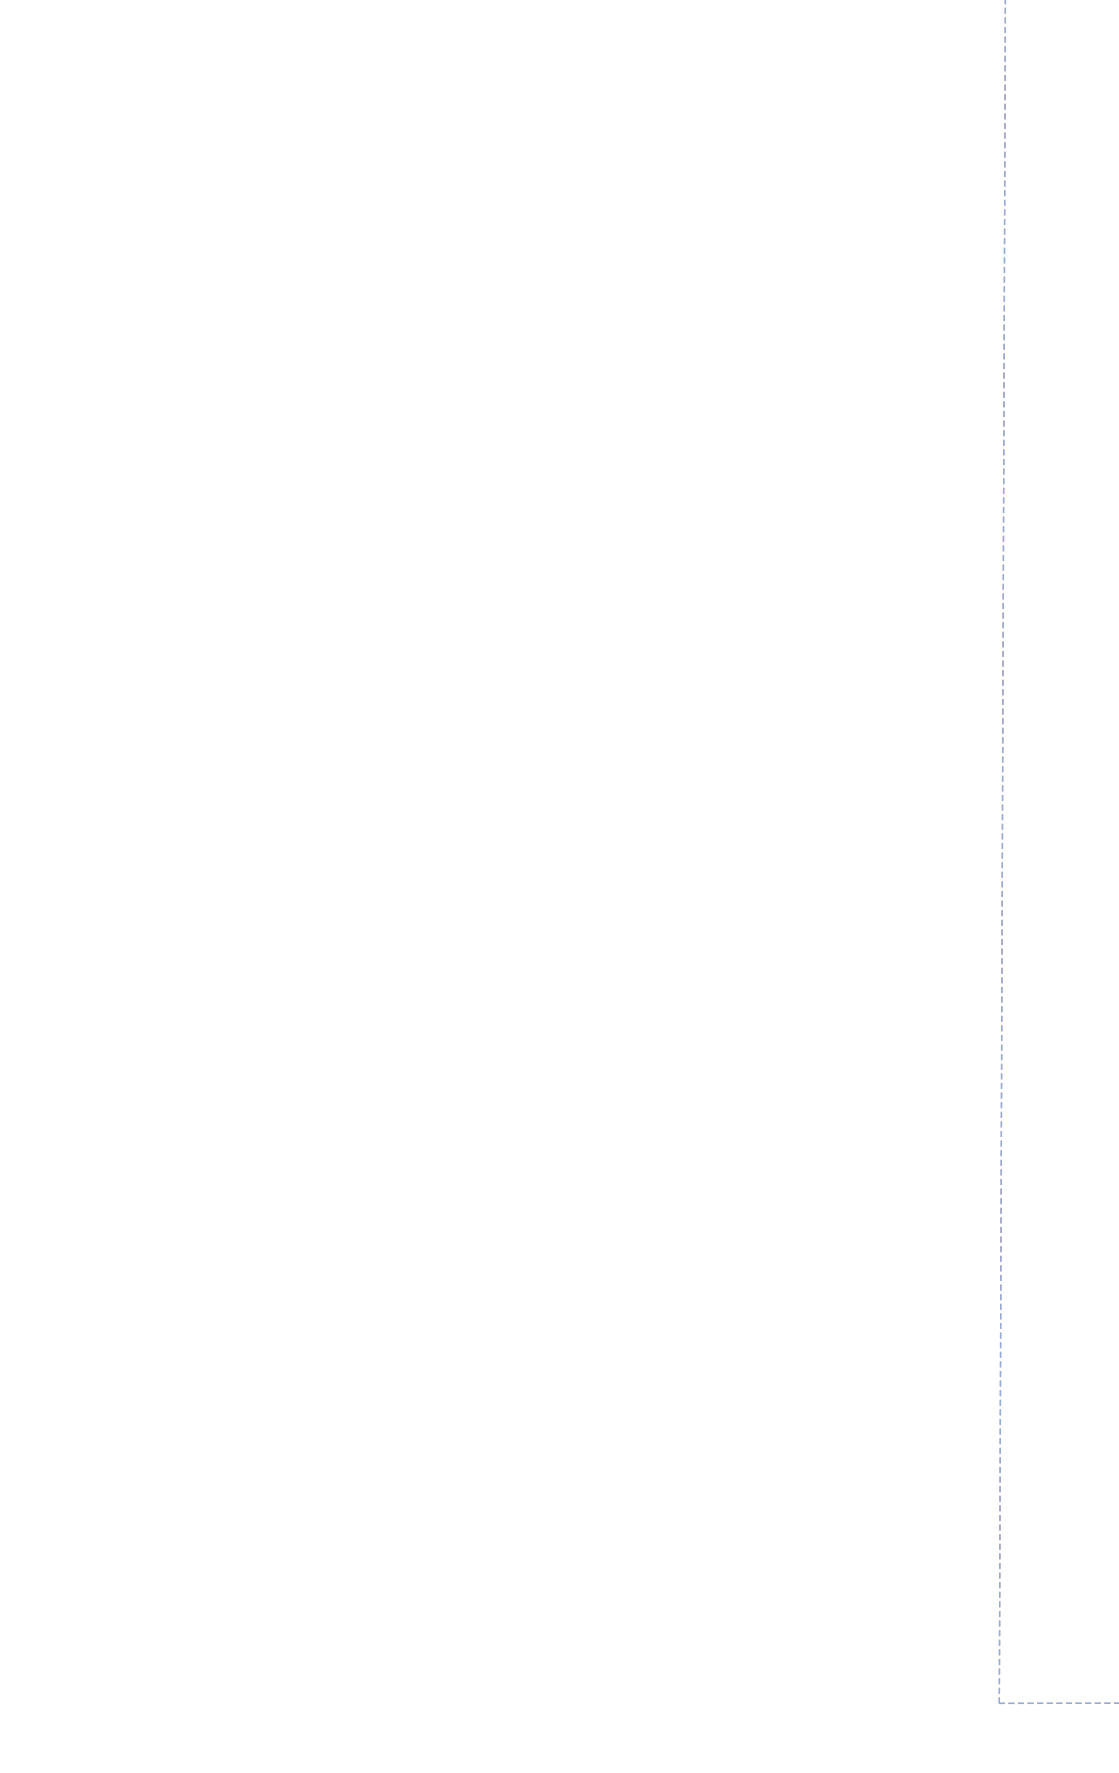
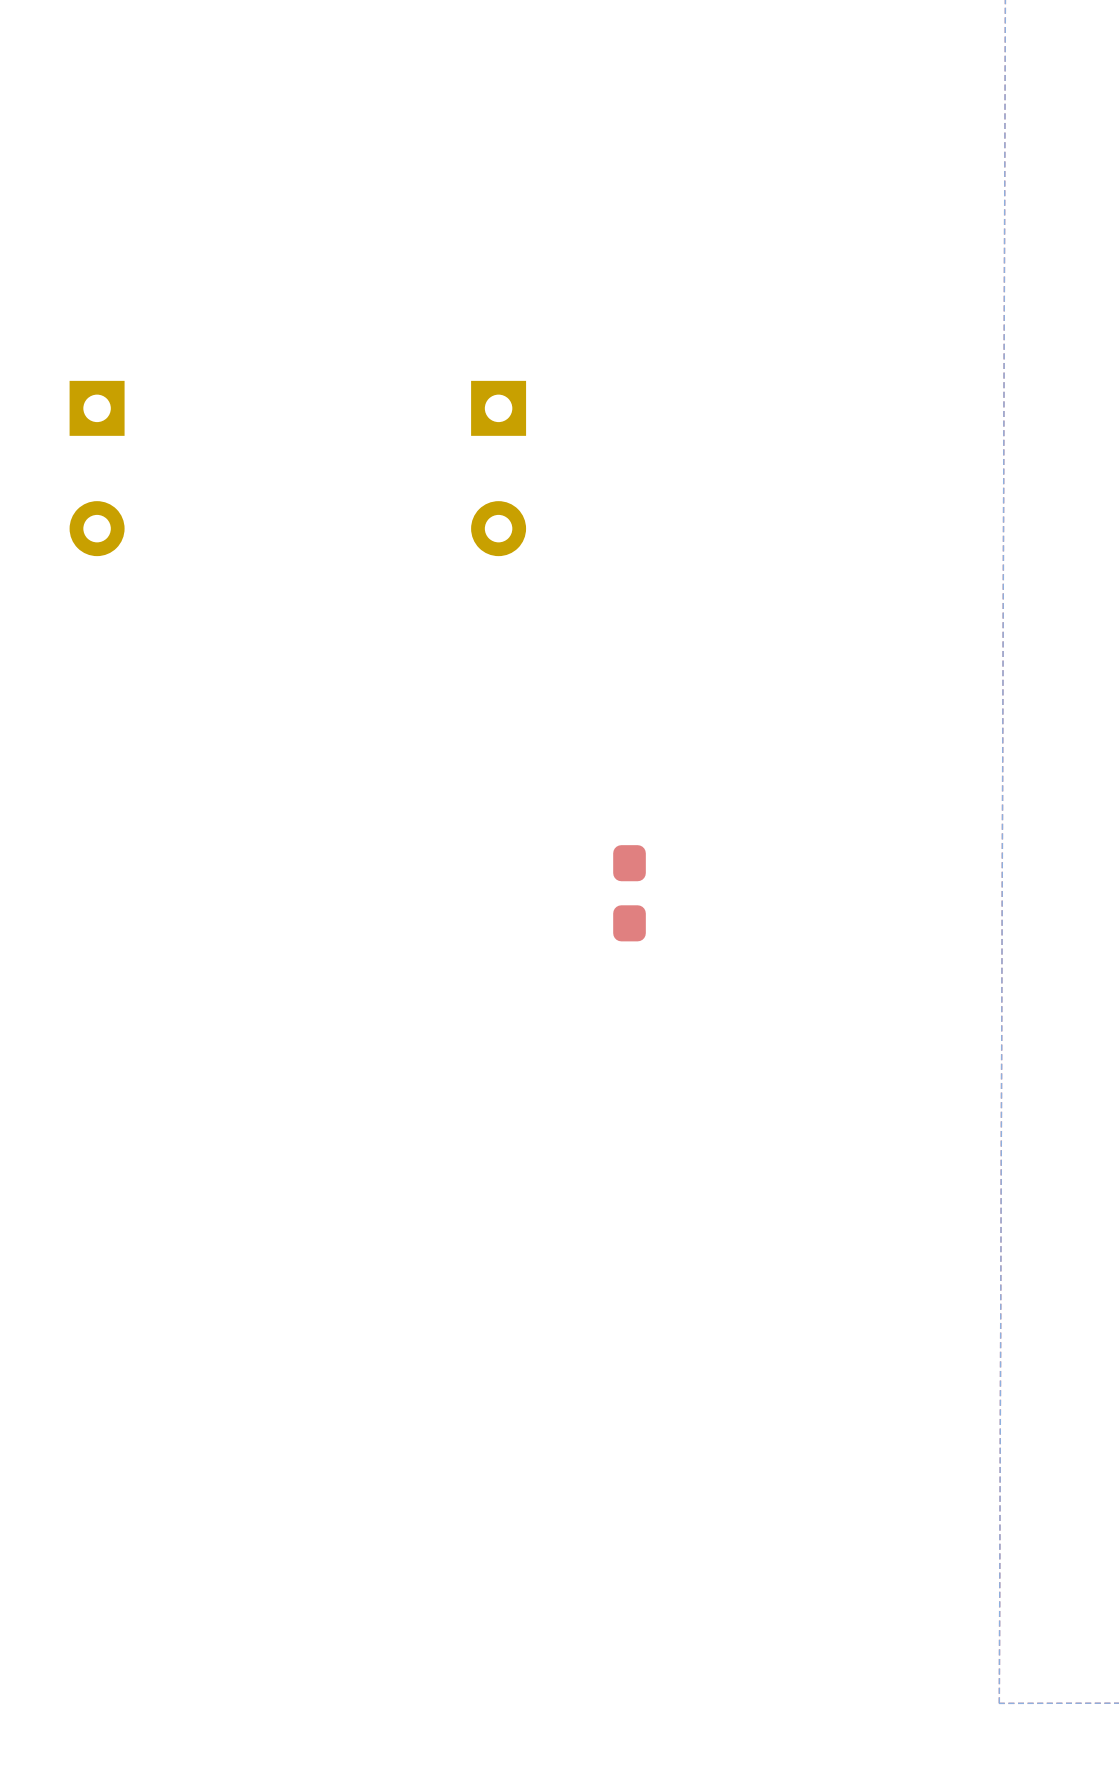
part: none -> (97, 468)
part: none -> (498, 468)
part: none -> (629, 893)

